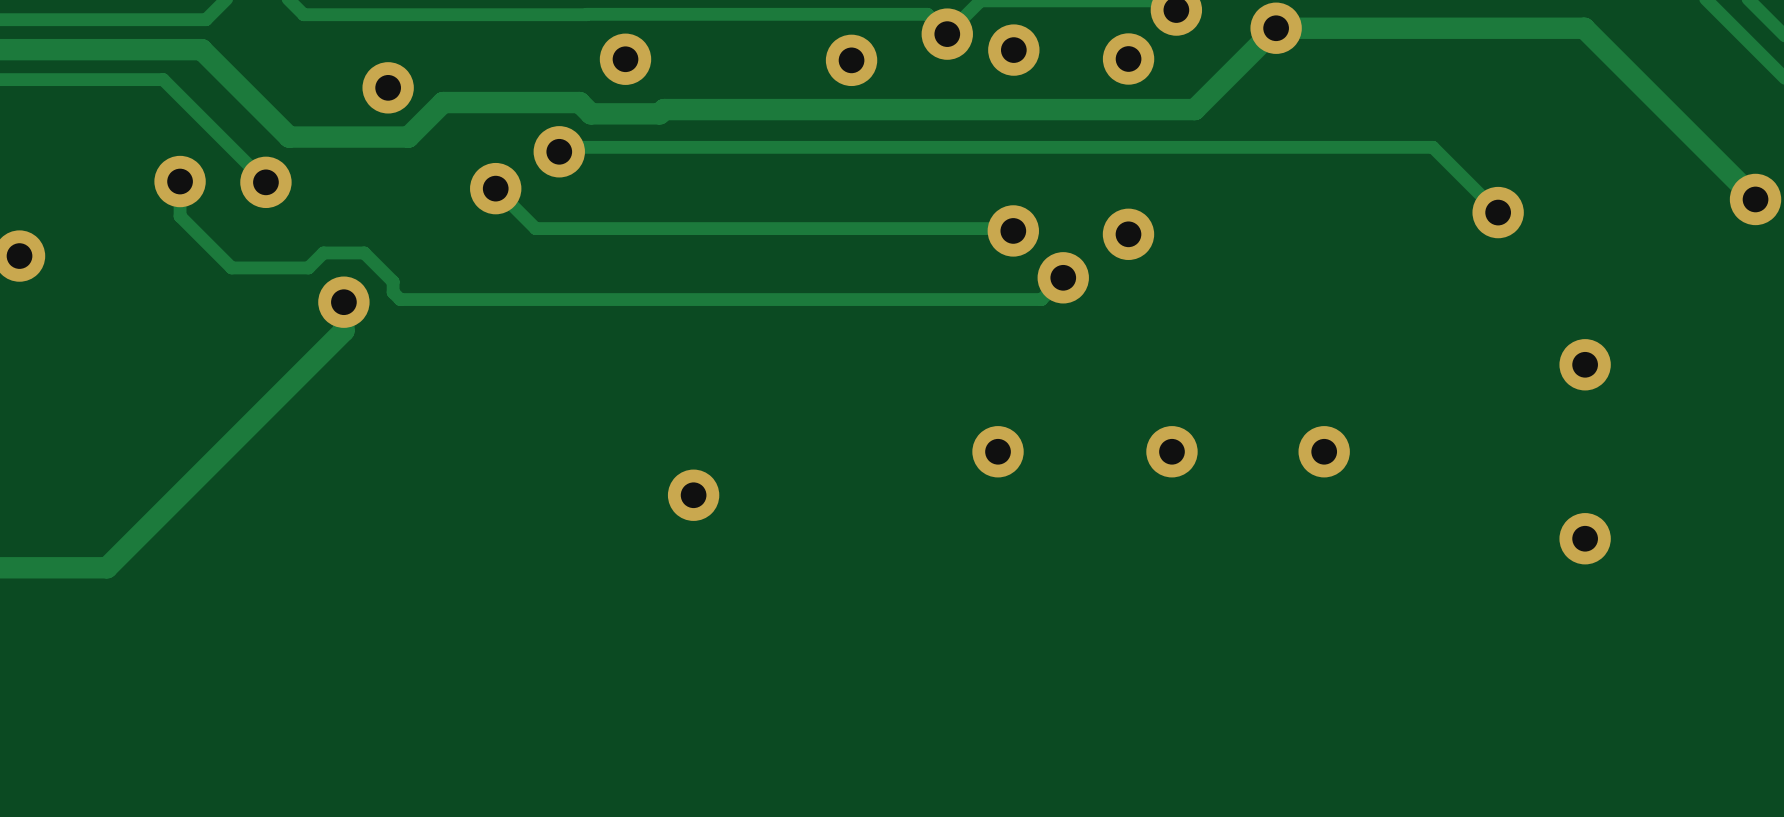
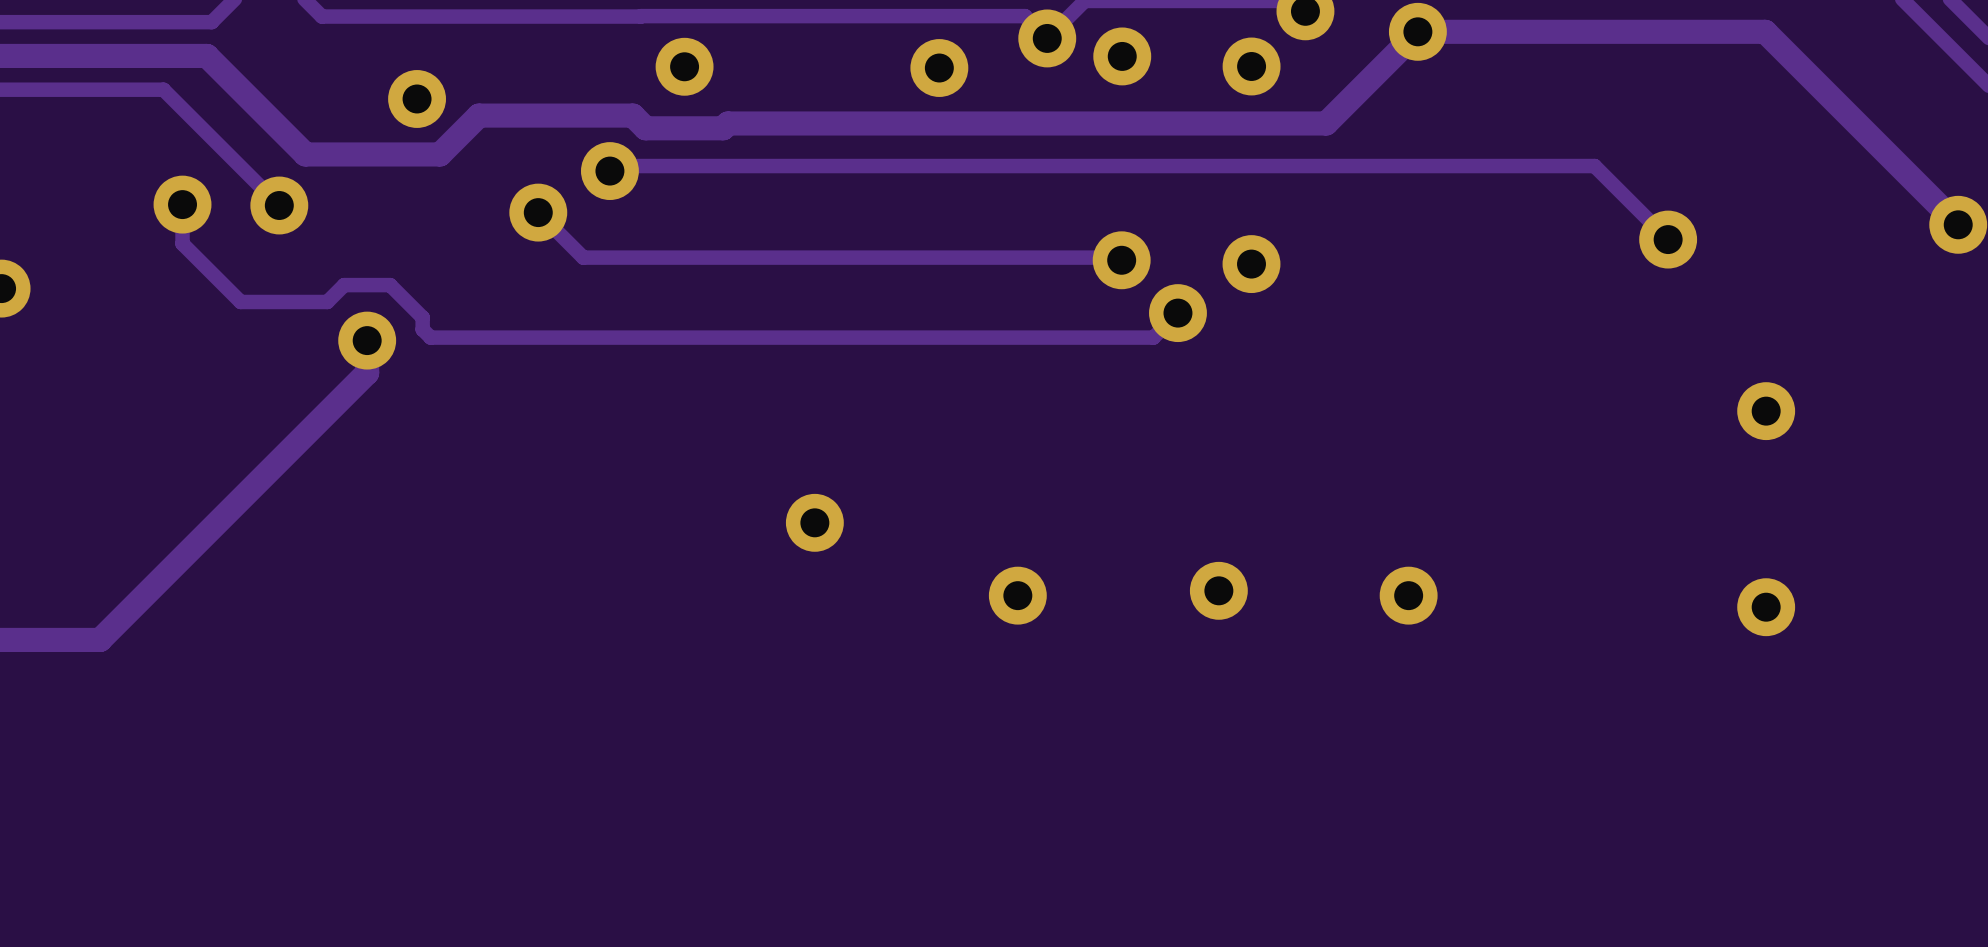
via: (998, 451) -> none
via: (1171, 451) -> none
via: (1324, 451) -> none
via position: (693, 495) -> (814, 522)
via: none -> (1218, 590)
via: none -> (1017, 595)
via: none -> (1408, 595)

